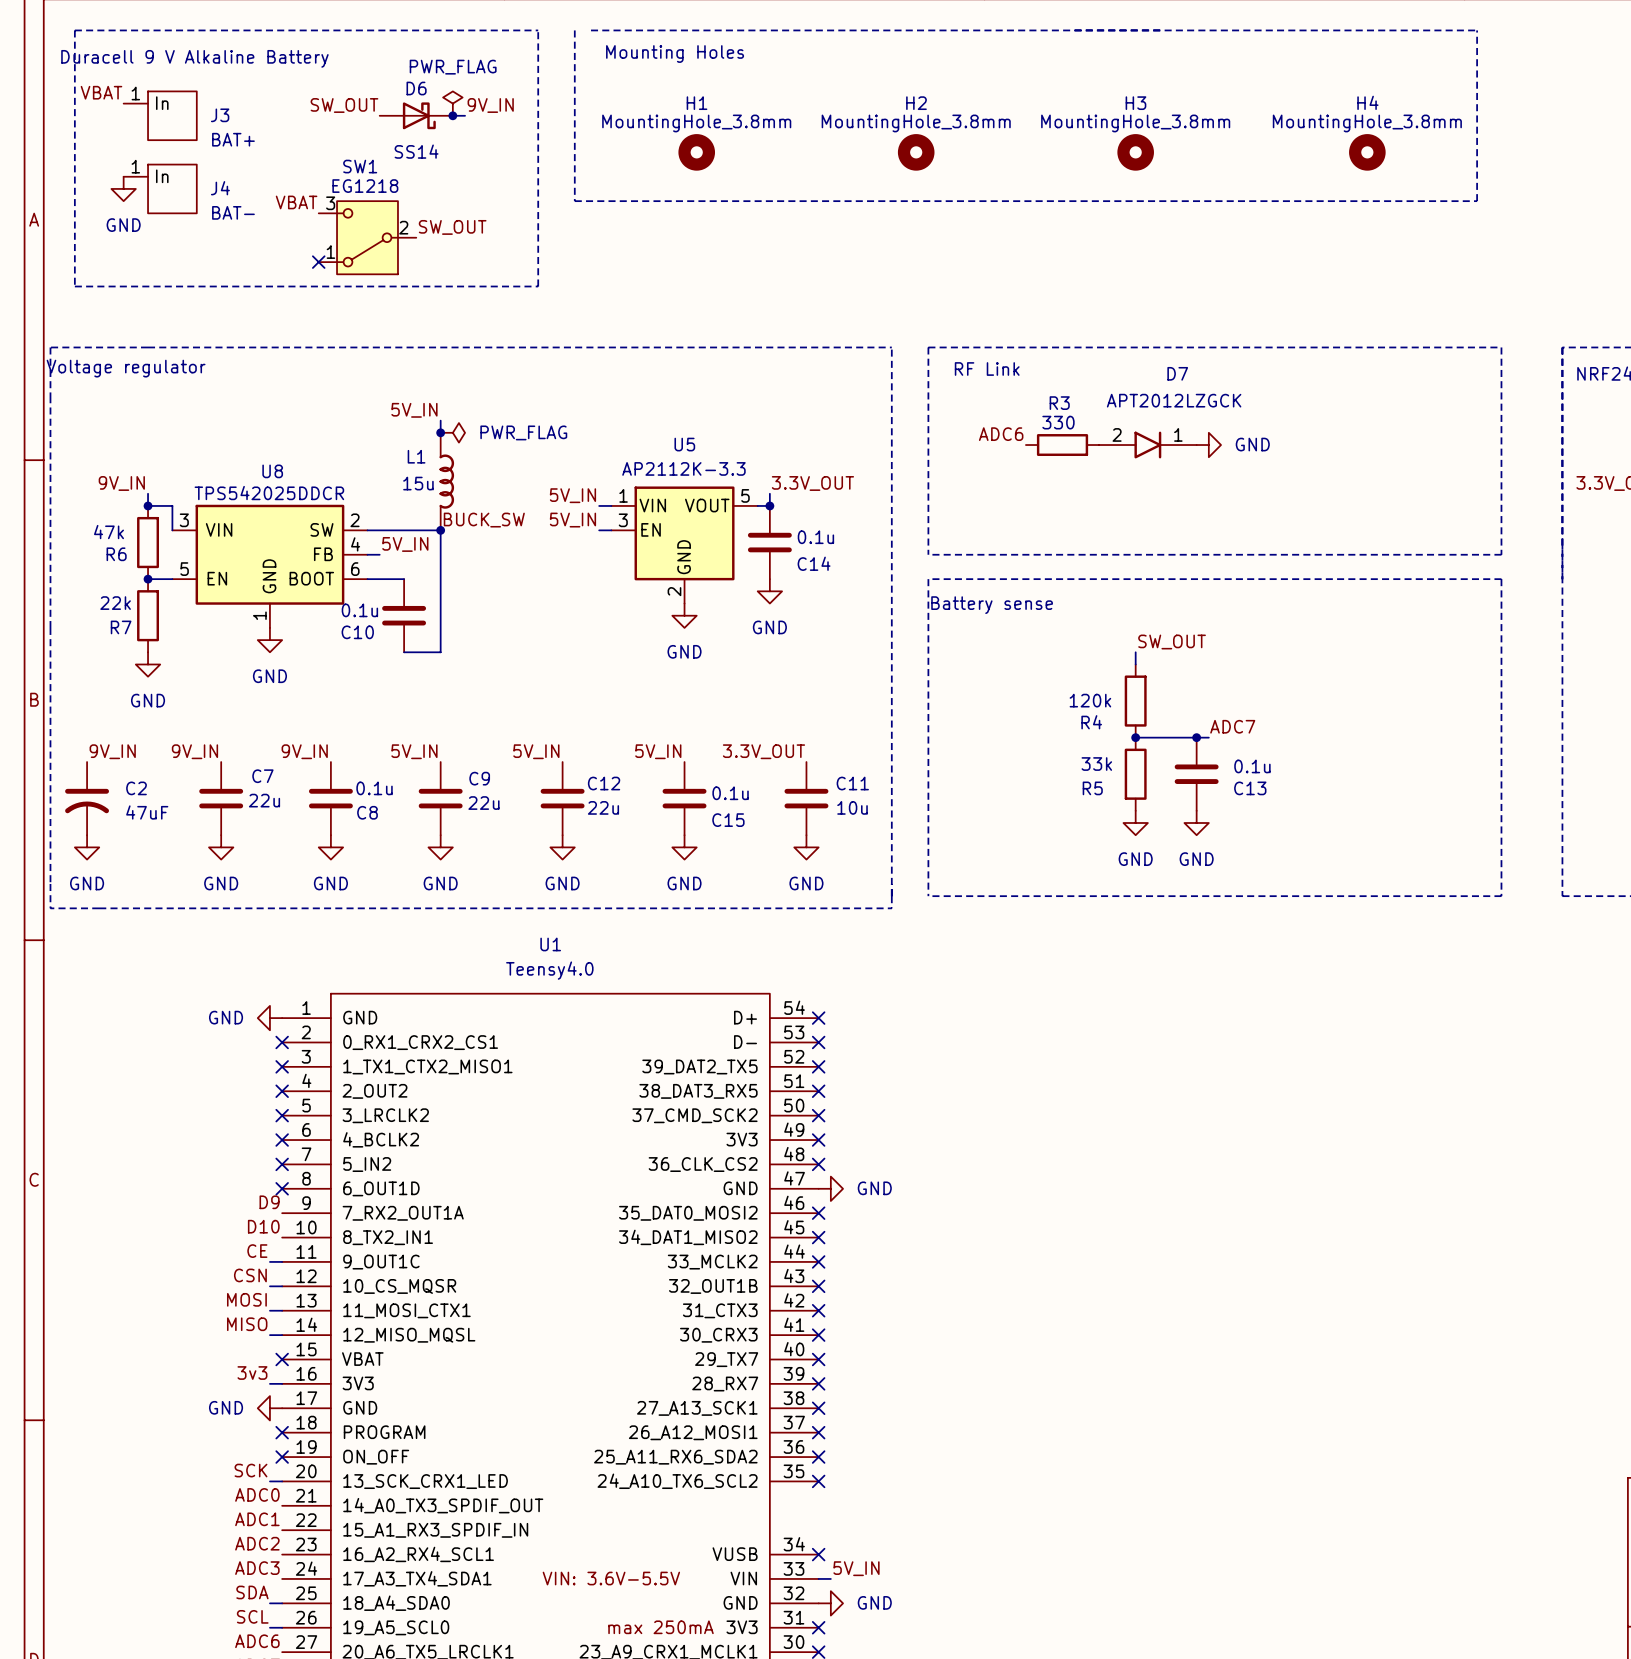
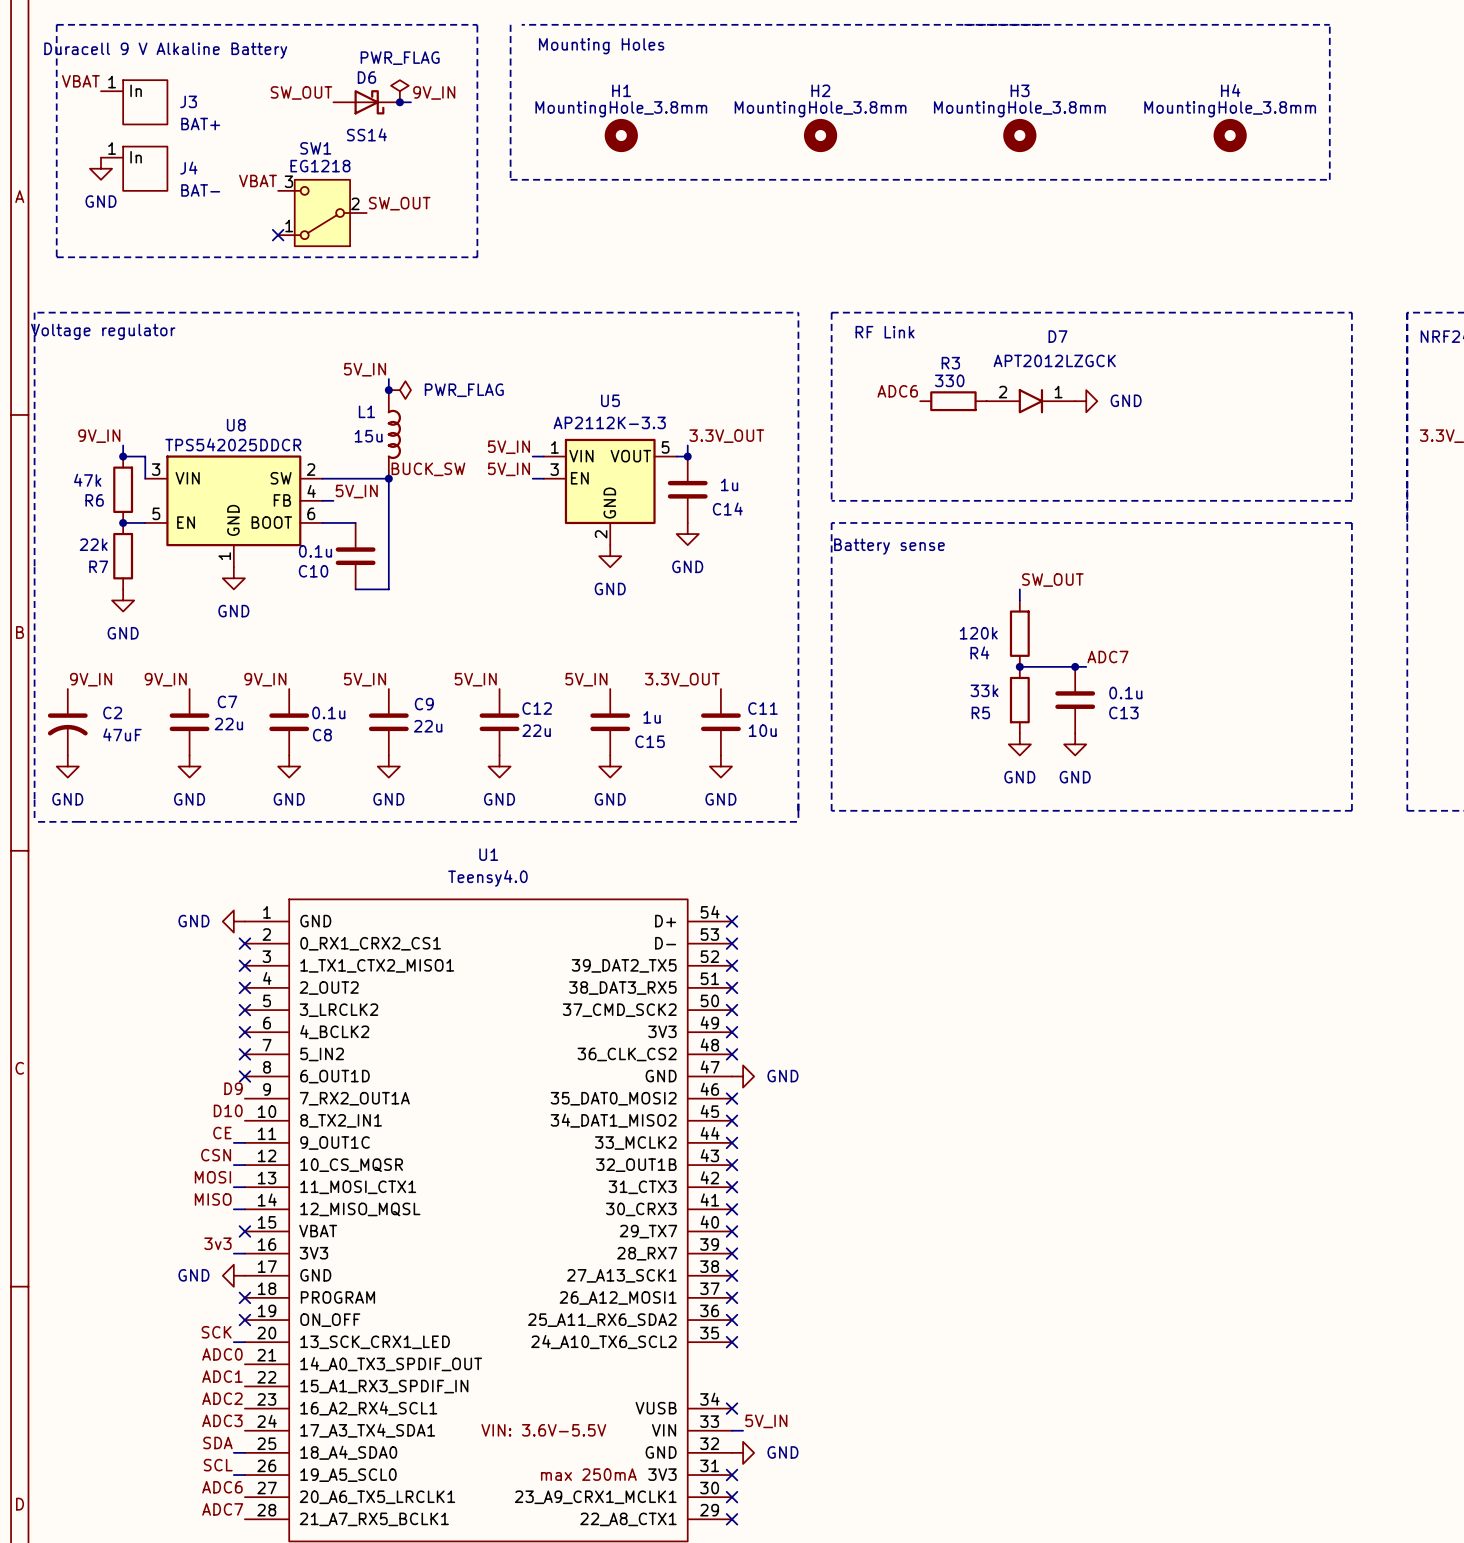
C14 value: 0.1u (815, 537) -> 1u (729, 484)
C15 value: 0.1u (730, 793) -> 1u (652, 717)

